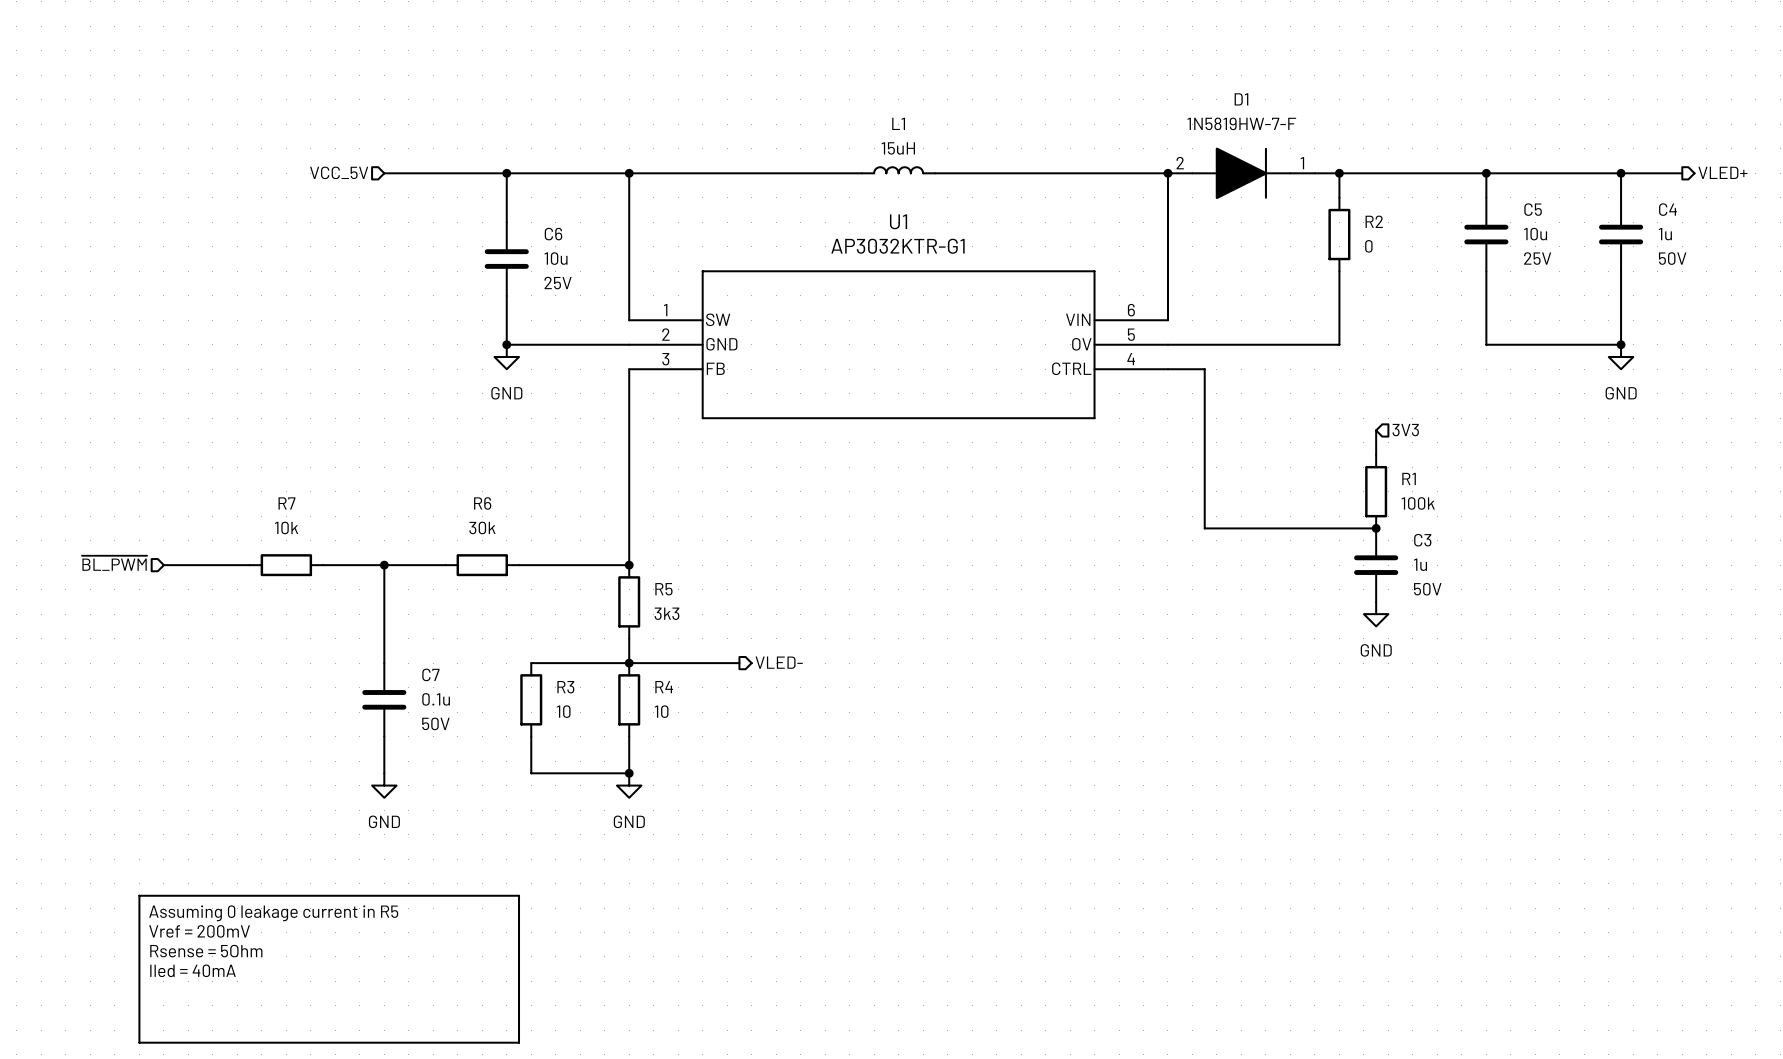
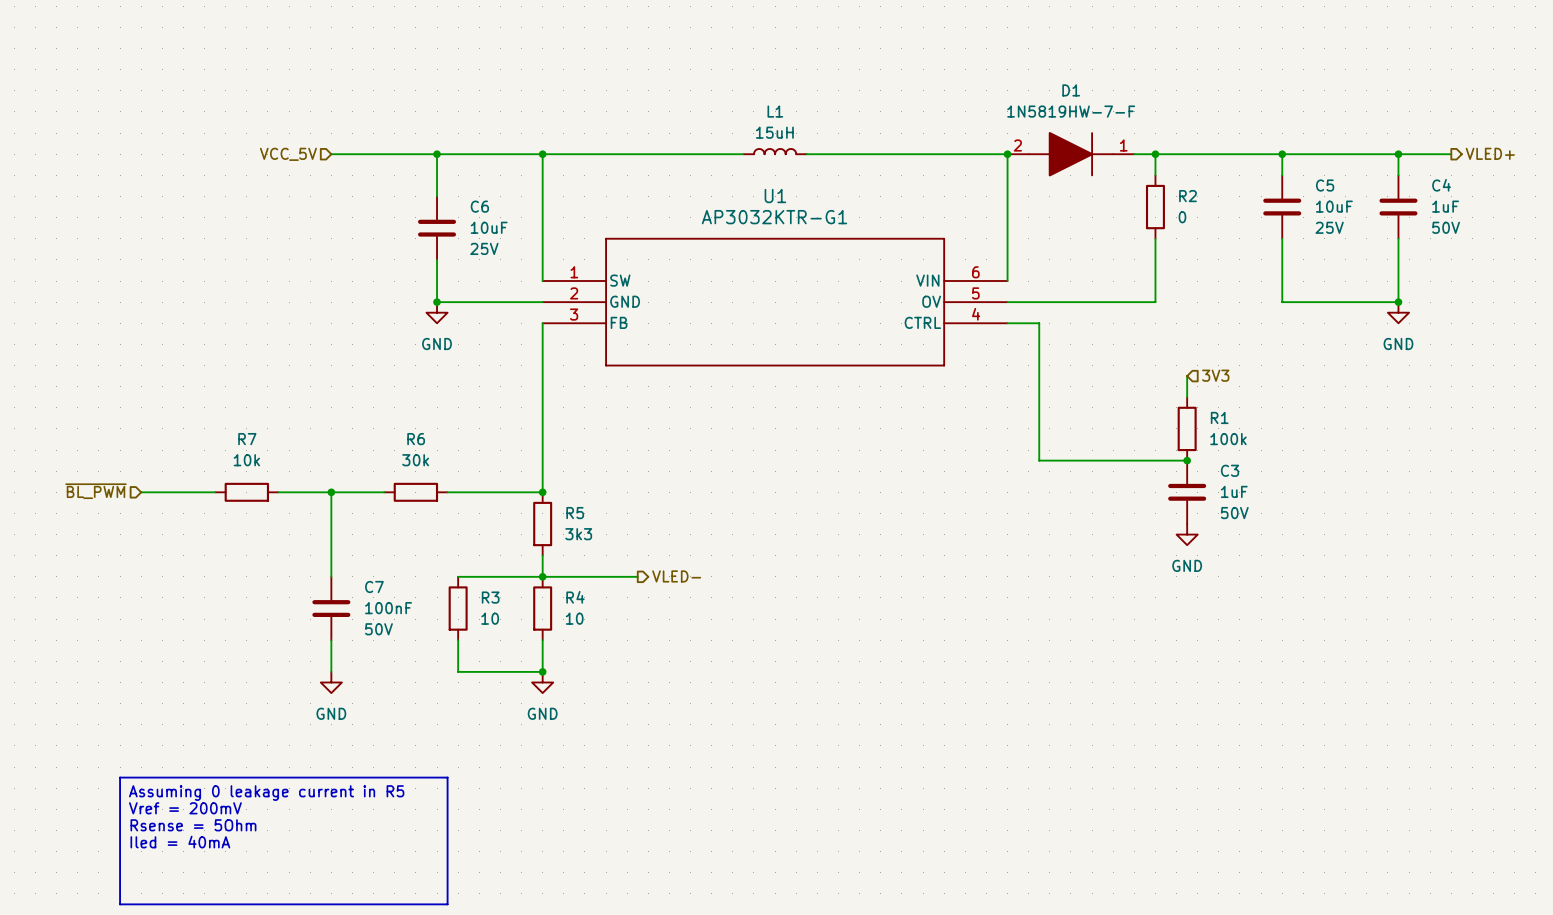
C5 value: 10u (1535, 234) -> 10uF (1334, 206)
C4 value: 1u (1665, 234) -> 1uF (1445, 206)
C6 value: 10u (556, 258) -> 10uF (489, 227)
C3 value: 1u (1420, 564) -> 1uF (1234, 491)
C7 value: 0.1u (436, 699) -> 100nF (388, 608)

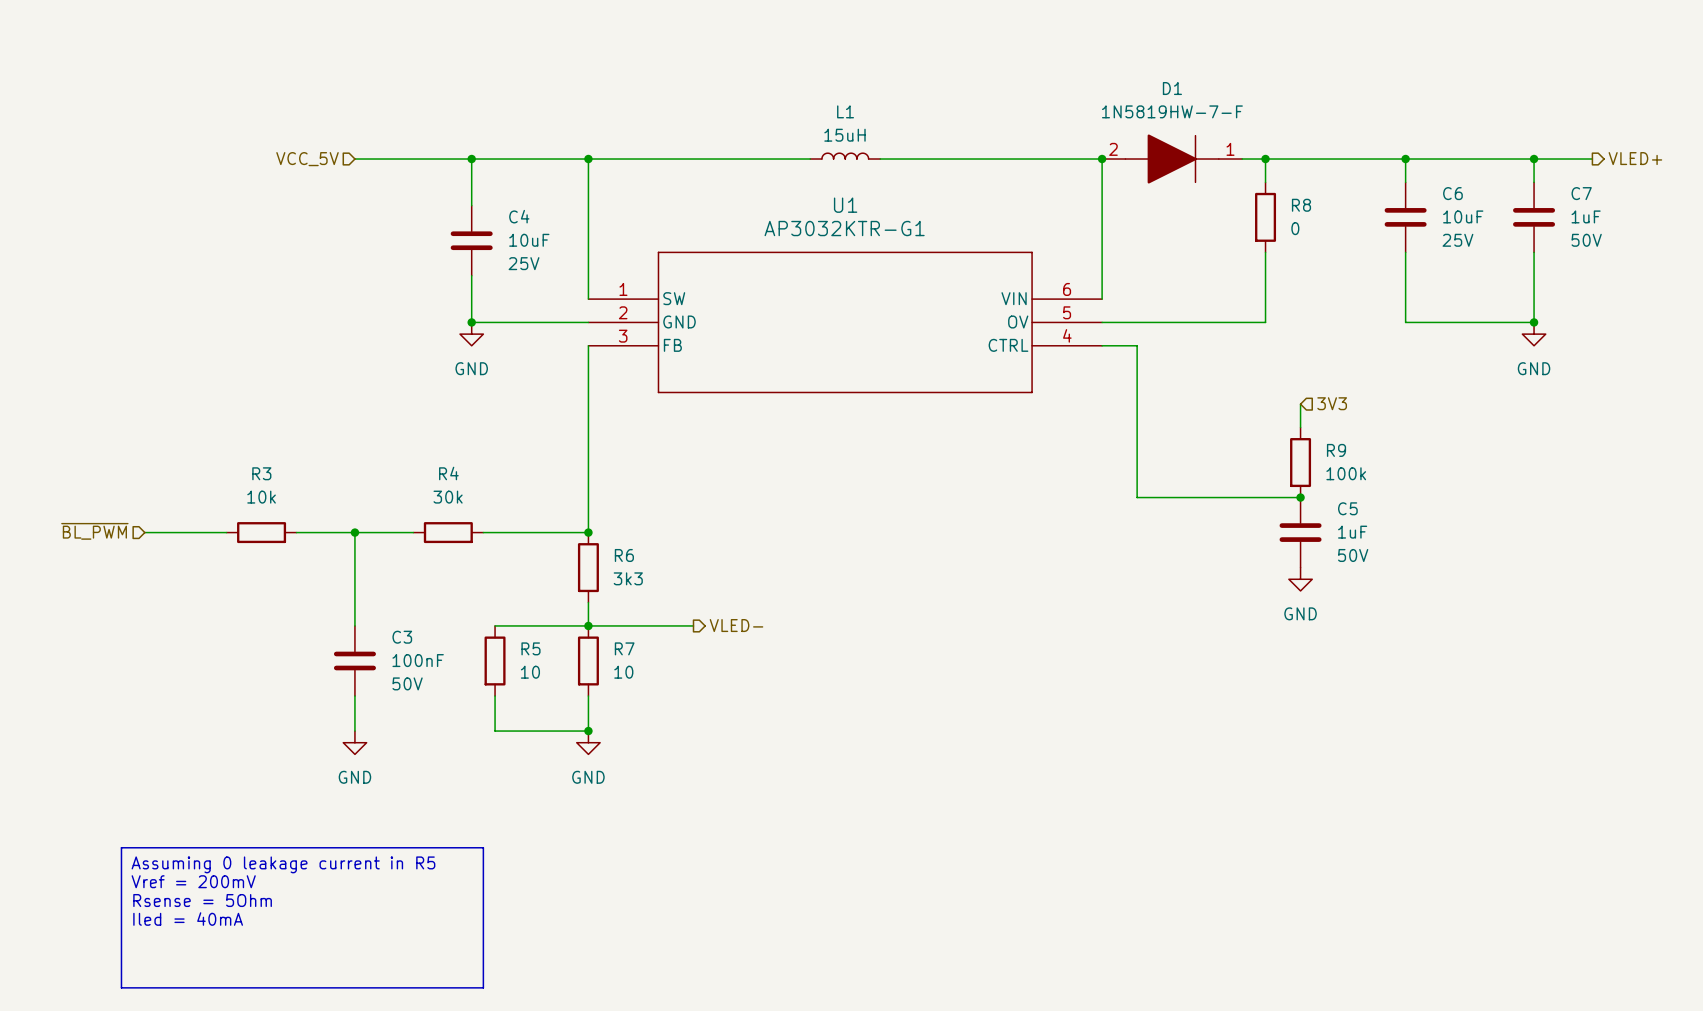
C5 name: C5 (1325, 185) -> C6 (1452, 193)
C4 name: C4 (1441, 185) -> C7 (1581, 193)
R2 name: R2 (1187, 196) -> R8 (1301, 205)
C6 name: C6 (479, 206) -> C4 (519, 216)
R1 name: R1 (1219, 417) -> R9 (1336, 450)
R7 name: R7 (247, 439) -> R3 (261, 473)
R6 name: R6 (416, 439) -> R4 (448, 473)
C3 name: C3 (1230, 470) -> C5 (1347, 508)
R5 name: R5 (575, 513) -> R6 (624, 555)
C7 name: C7 (374, 587) -> C3 (402, 637)
R3 name: R3 (490, 597) -> R5 (530, 648)
R4 name: R4 (575, 597) -> R7 (624, 648)

